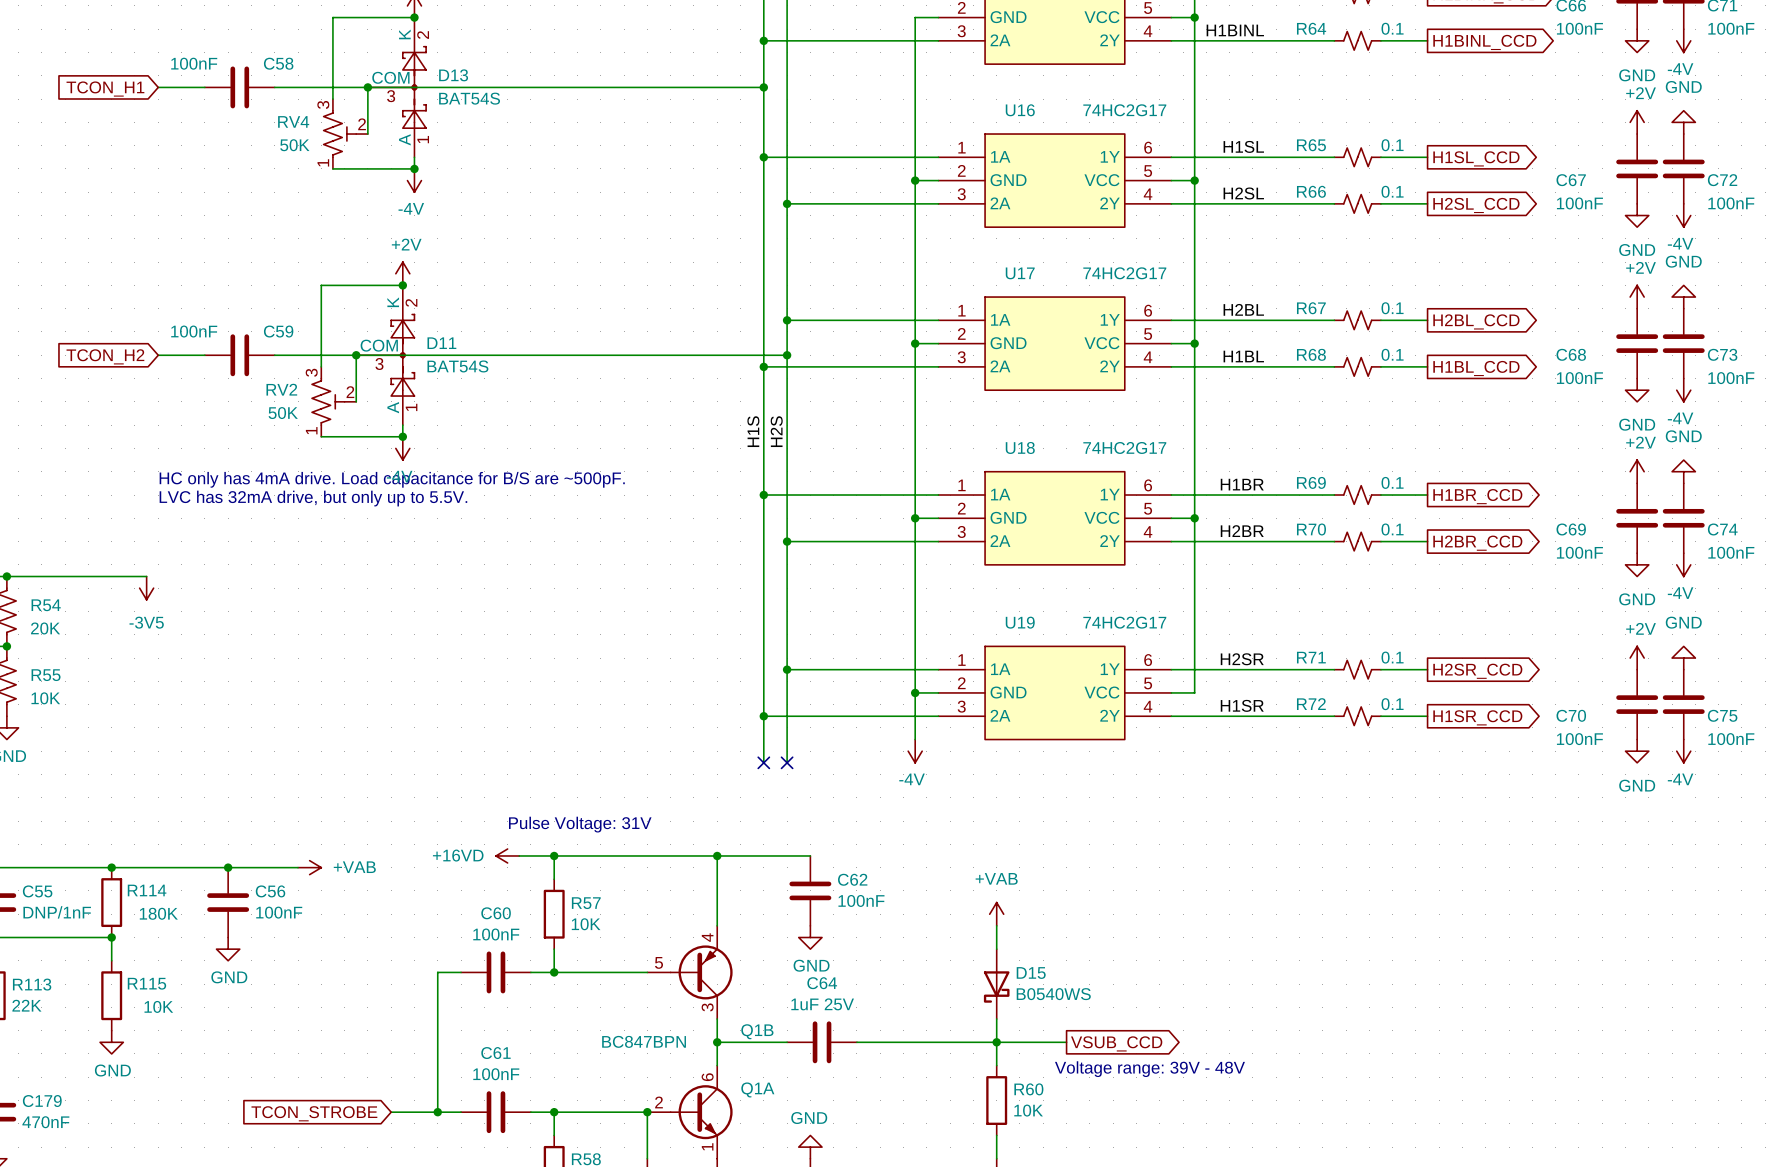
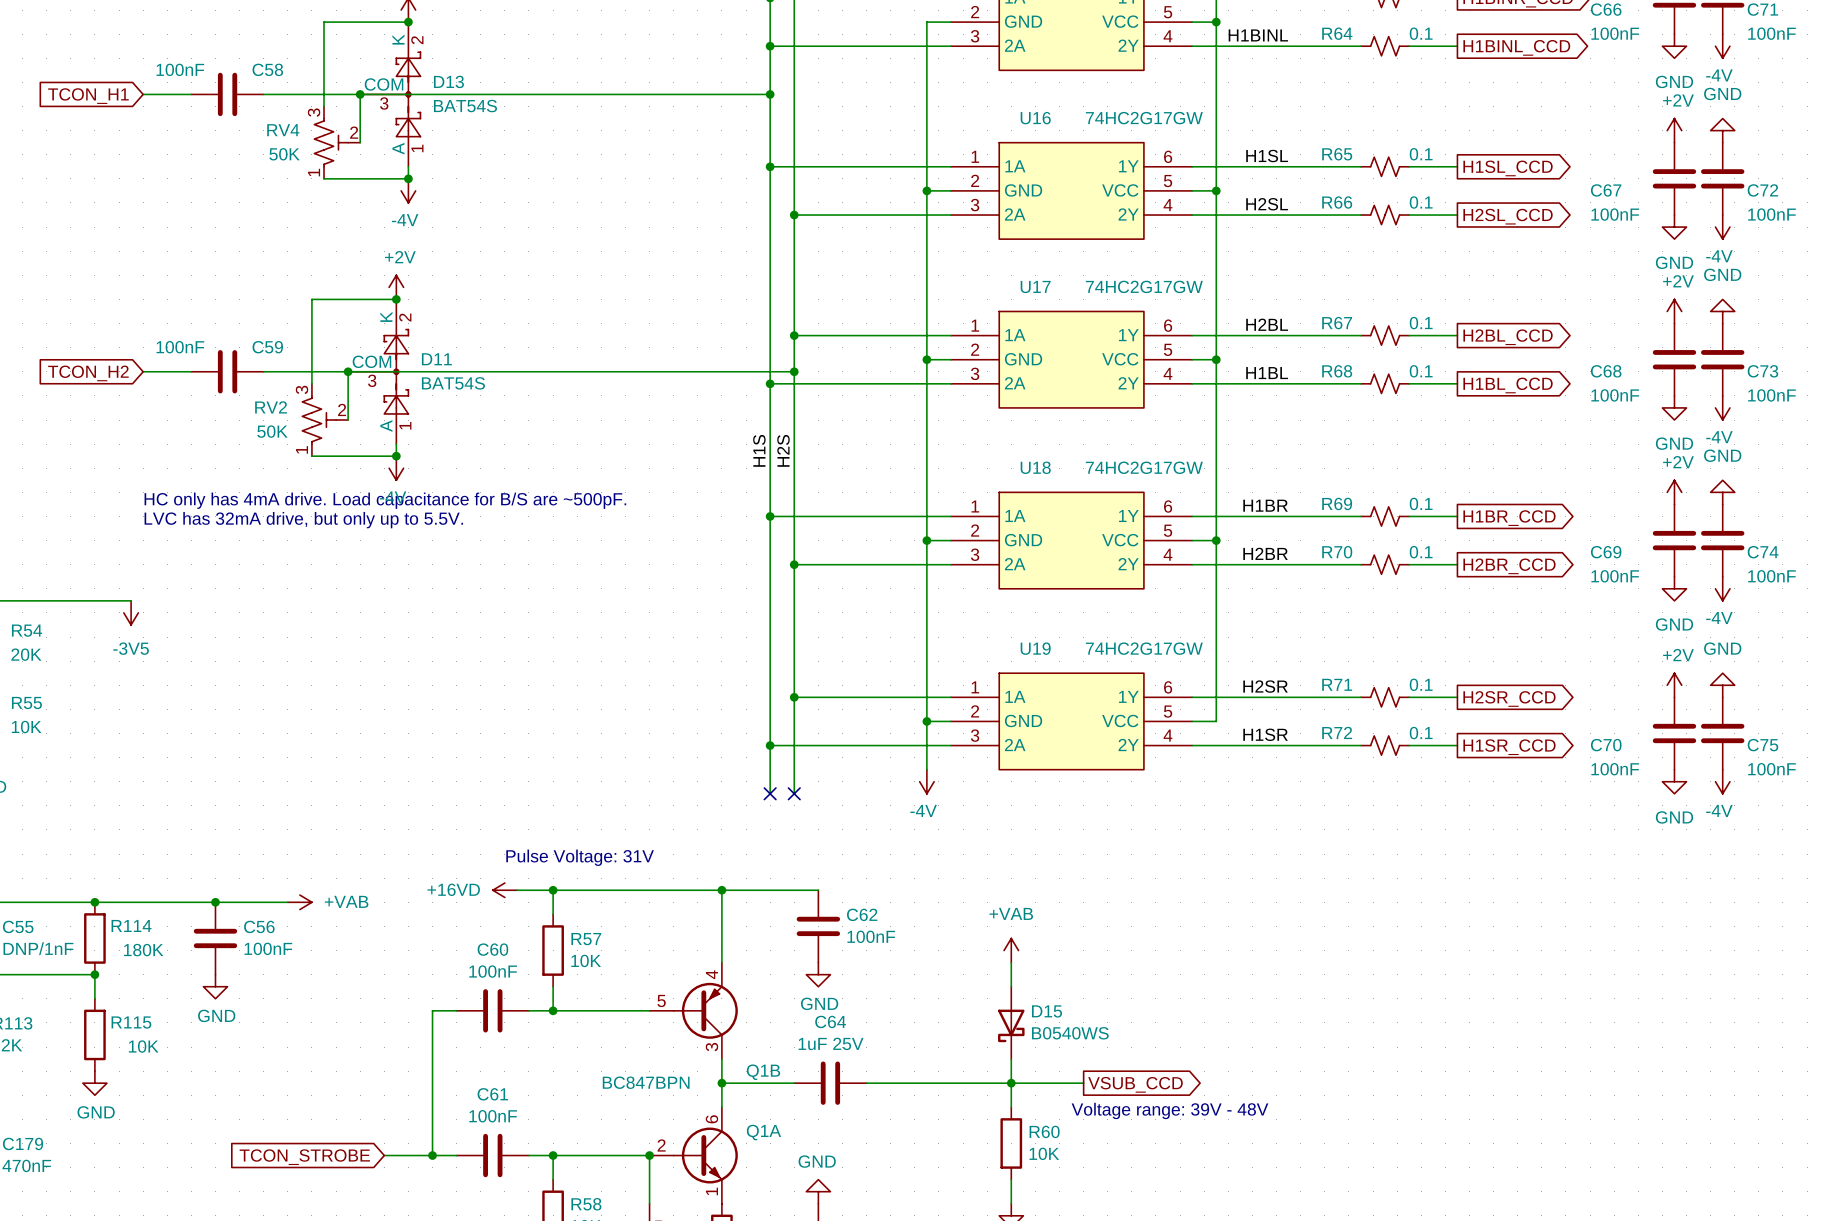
U16 value: 74HC2G17 (1124, 110) -> 74HC2G17GW (1144, 118)
U17 value: 74HC2G17 (1124, 273) -> 74HC2G17GW (1144, 286)
U18 value: 74HC2G17 (1124, 447) -> 74HC2G17GW (1144, 467)
U19 value: 74HC2G17 (1124, 622) -> 74HC2G17GW (1144, 648)

